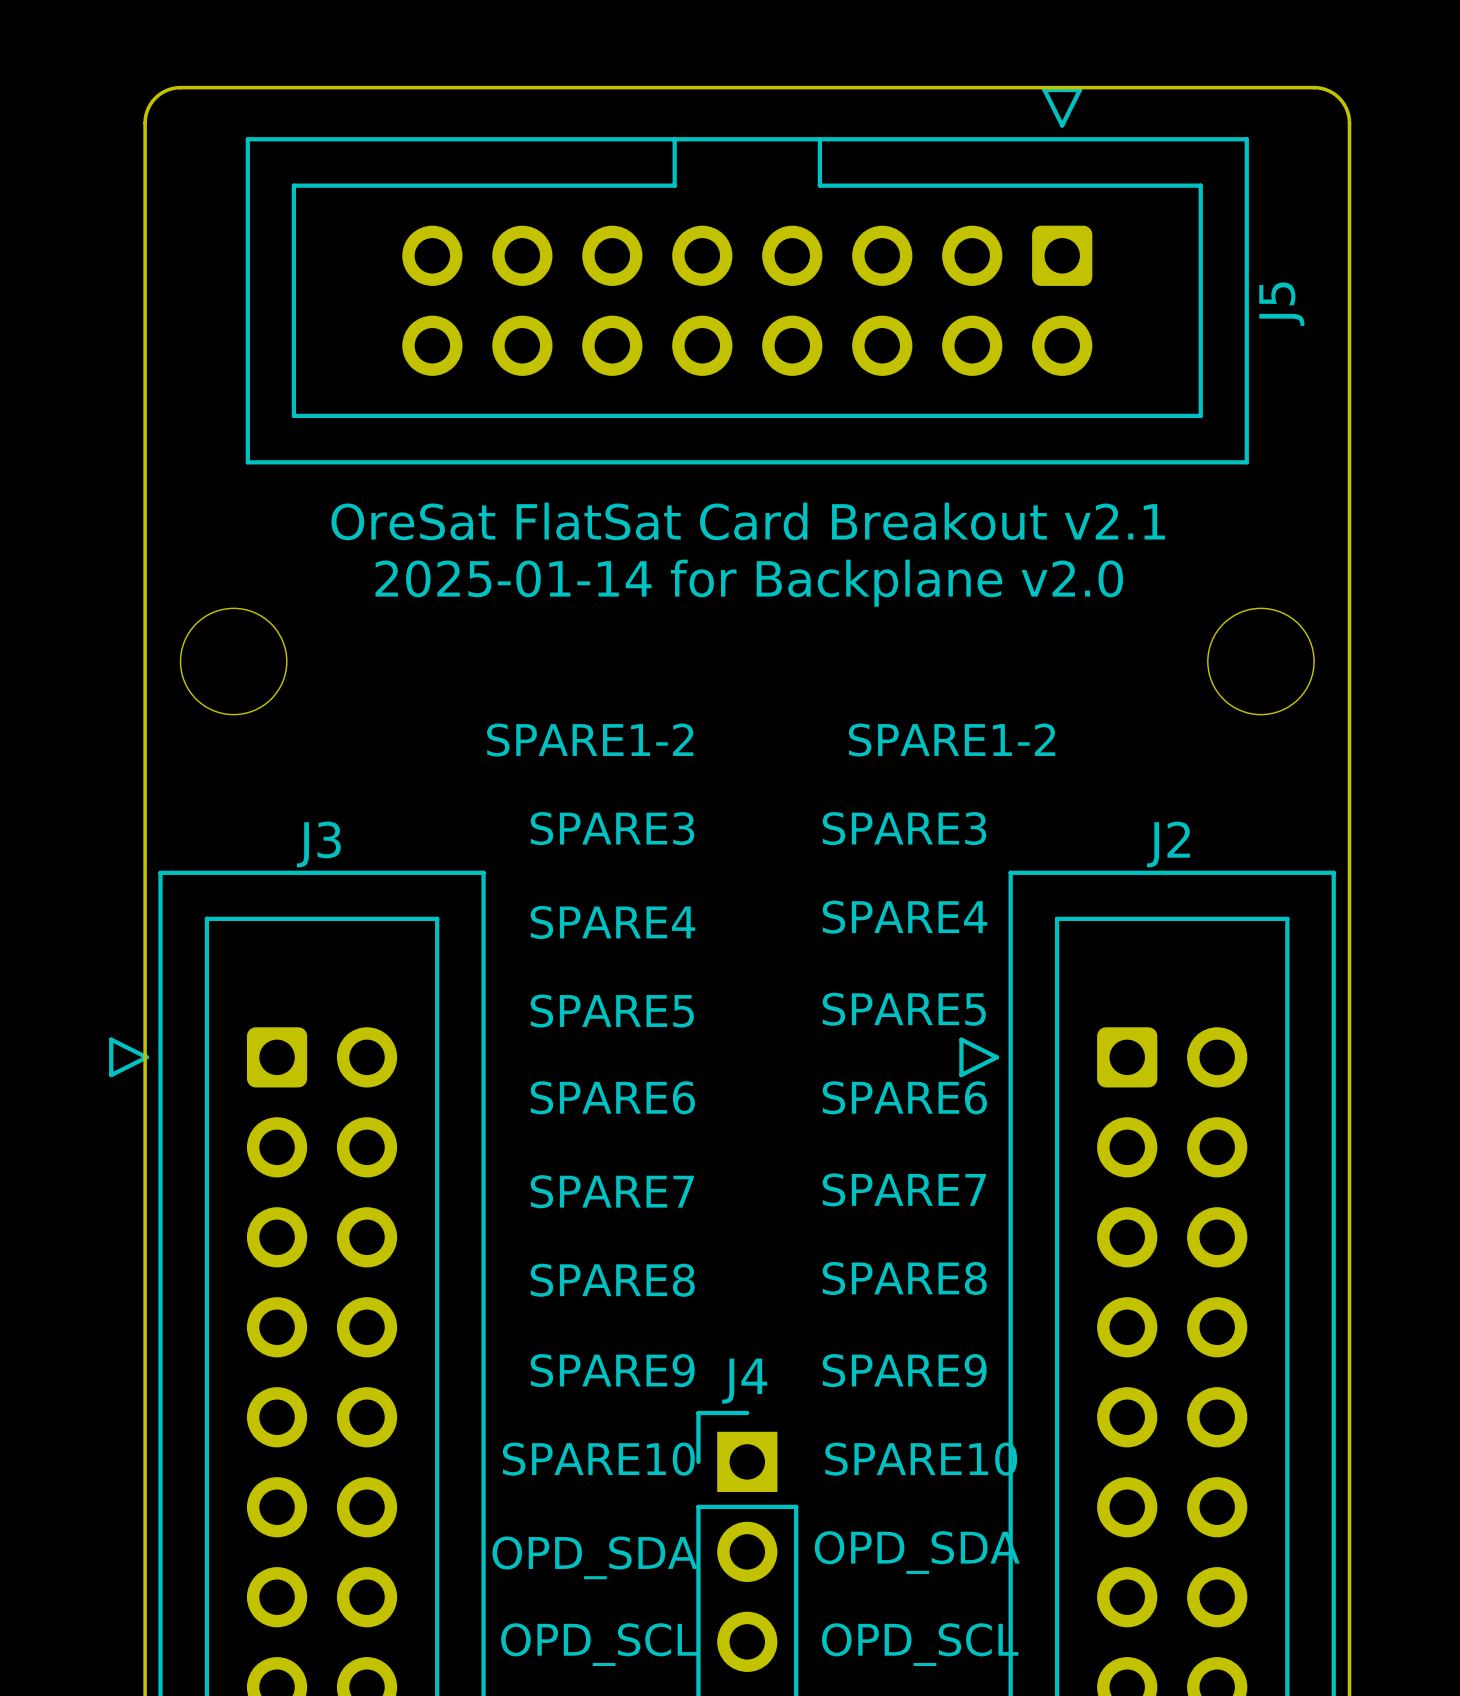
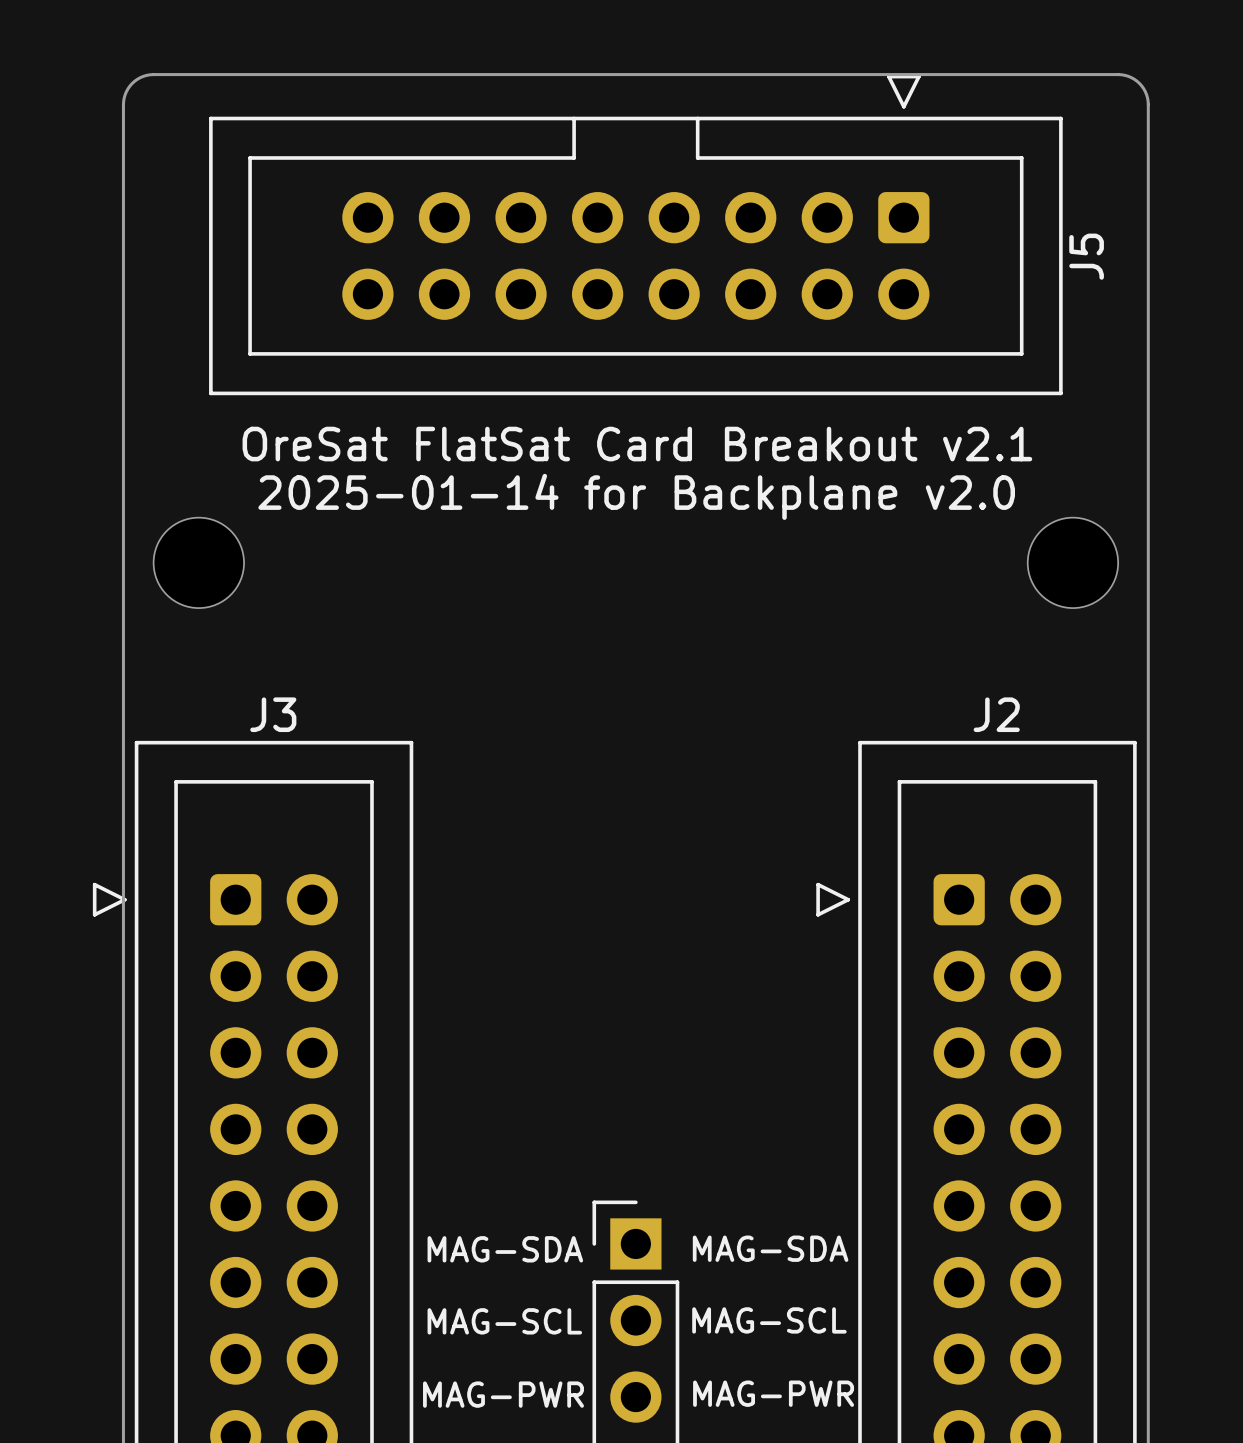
text: SPARE1-2 (590, 740) -> none
text: SPARE1-2 (952, 740) -> none
text: SPARE3 (612, 828) -> none
text: SPARE3 (904, 828) -> none
text: SPARE4 (904, 917) -> none
text: SPARE4 (612, 922) -> none
text: SPARE5 (904, 1009) -> none
text: SPARE5 (612, 1011) -> none
text: SPARE6 (612, 1097) -> none
text: SPARE6 (904, 1097) -> none
text: SPARE7 (904, 1189) -> none
text: SPARE7 (612, 1191) -> none
text: SPARE8 (904, 1278) -> none
text: SPARE8 (612, 1280) -> none
text: SPARE9 (612, 1370) -> none
text: SPARE9 (904, 1370) -> none
J4 name: J4 (744, 1381) -> none
text: SPARE10 (598, 1459) -> none
text: SPARE10 (921, 1459) -> none
text: none -> MAG-SDA (770, 1248)
text: none -> MAG-SDA (505, 1249)
text: none -> MAG-SCL (769, 1320)
text: none -> MAG-SCL (504, 1321)
text: OPD_SDA (917, 1552) -> none
text: OPD_SDA (594, 1557) -> none
text: none -> MAG-PWR (773, 1393)
text: none -> MAG-PWR (503, 1394)
text: OPD_SCL (599, 1644) -> none
text: OPD_SCL (920, 1644) -> none

